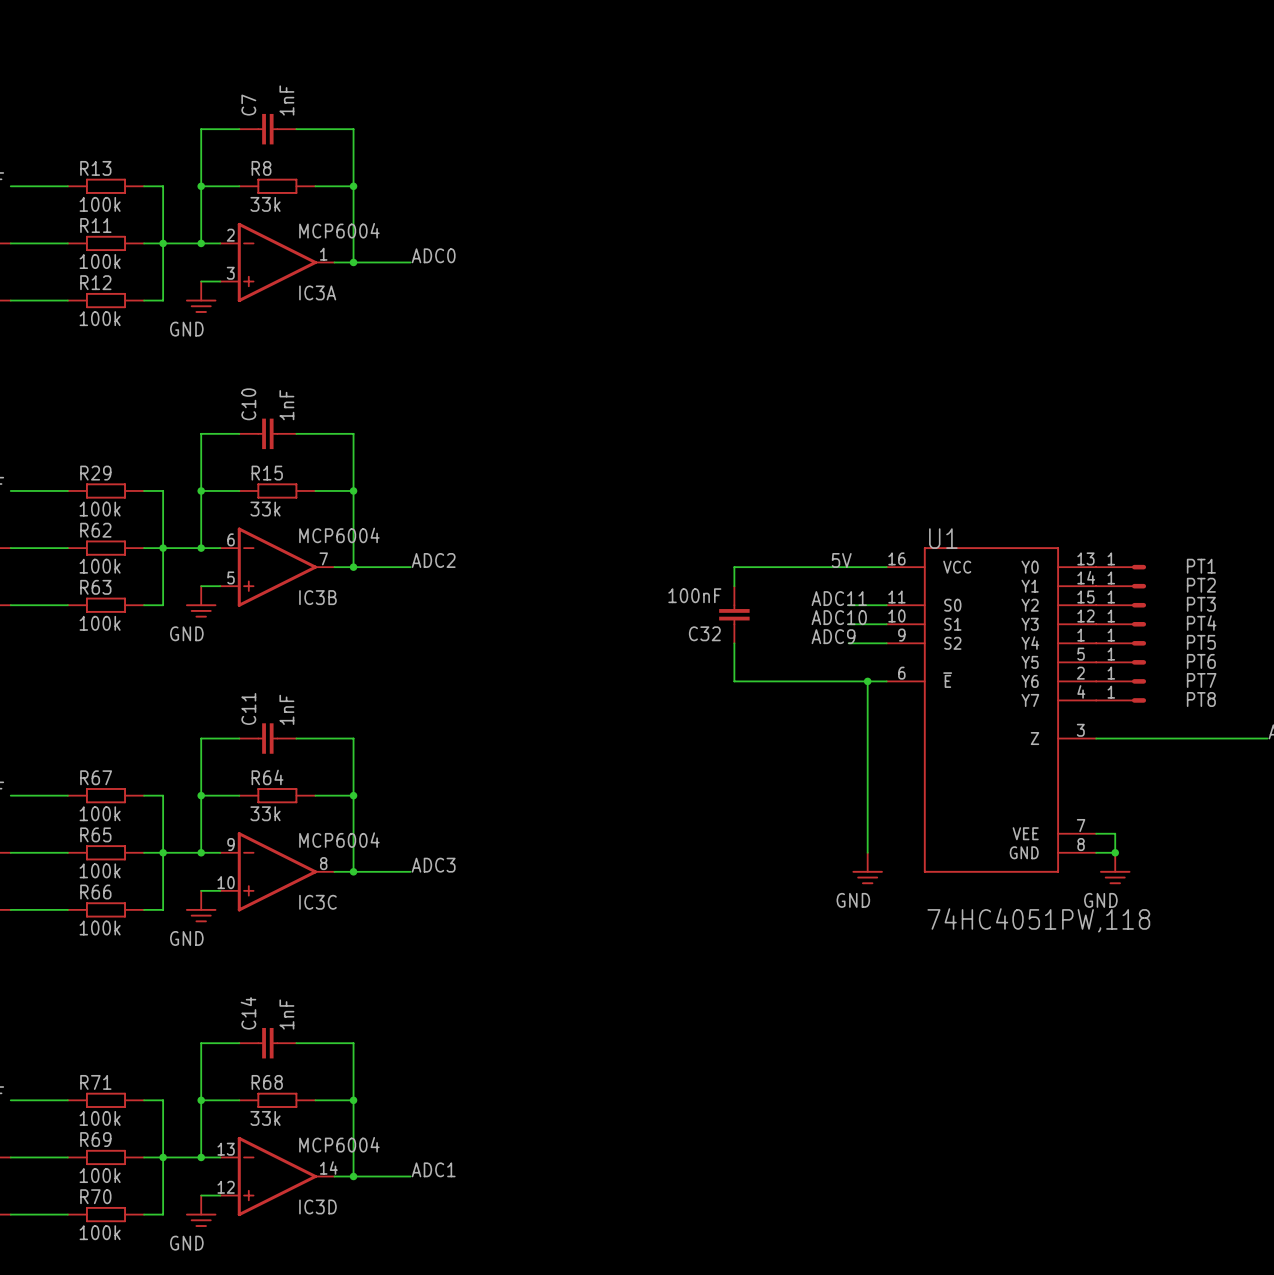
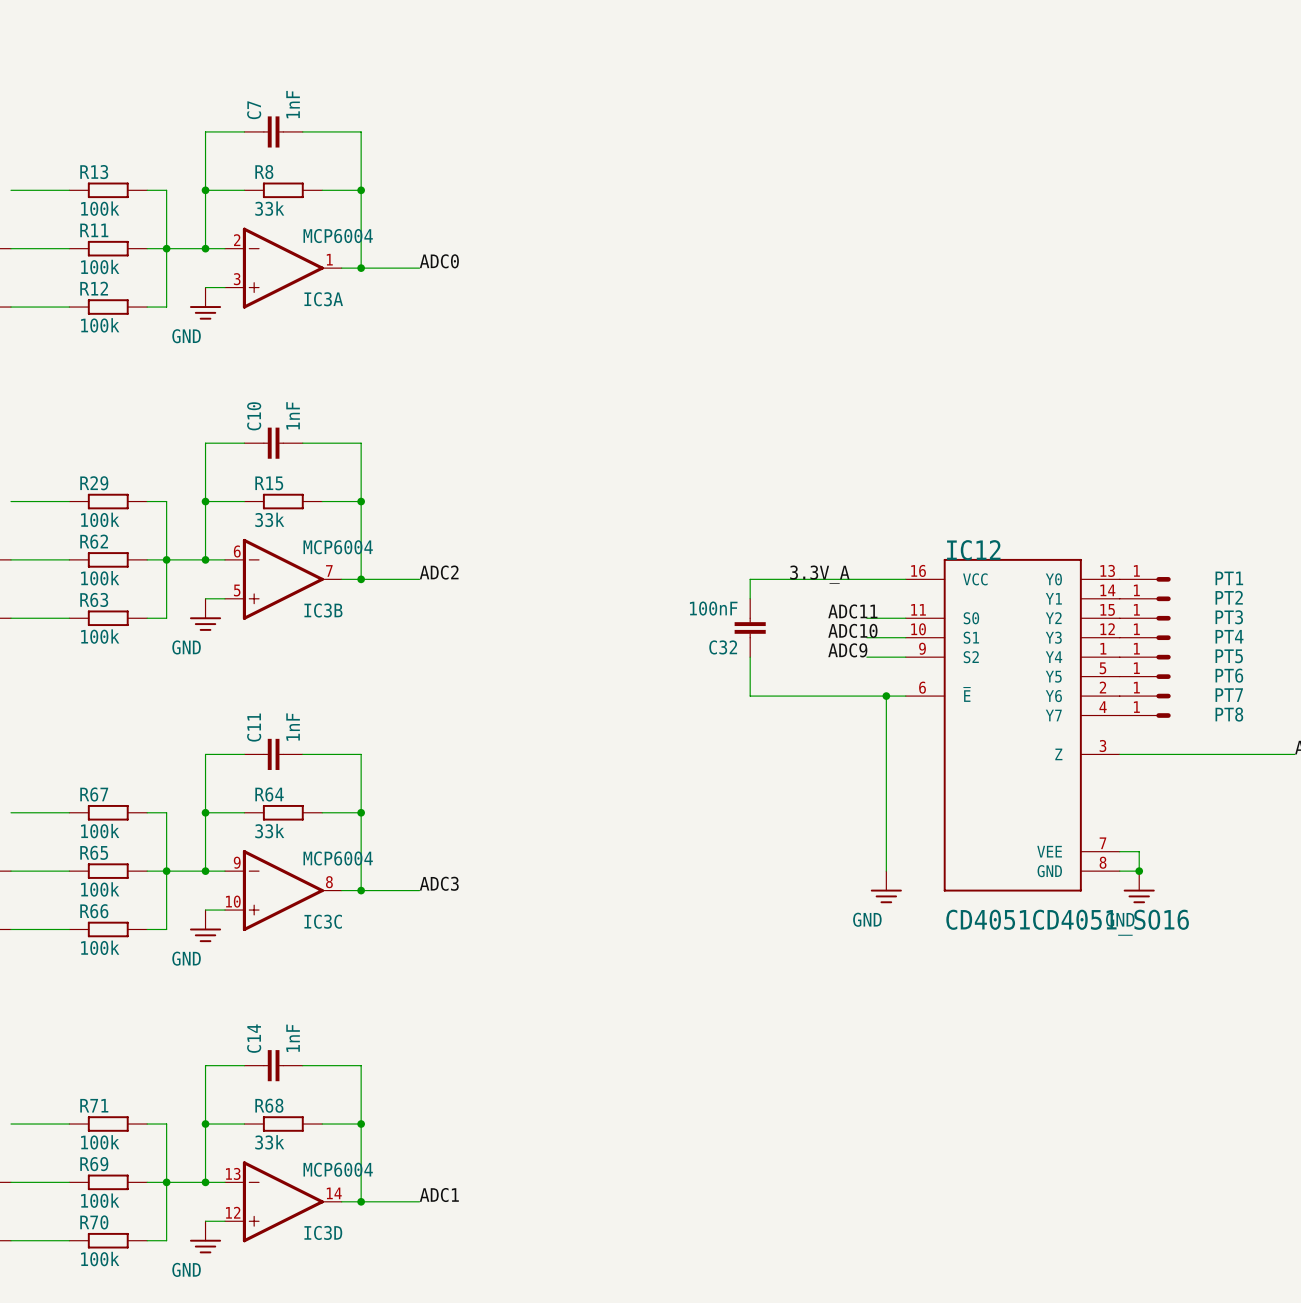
label: 5V (841, 560) -> none
label: none -> 3.3V_A (819, 574)
U1: (991, 709) -> none
IC12: none -> CD4051CD4051_SO16 (1012, 725)

